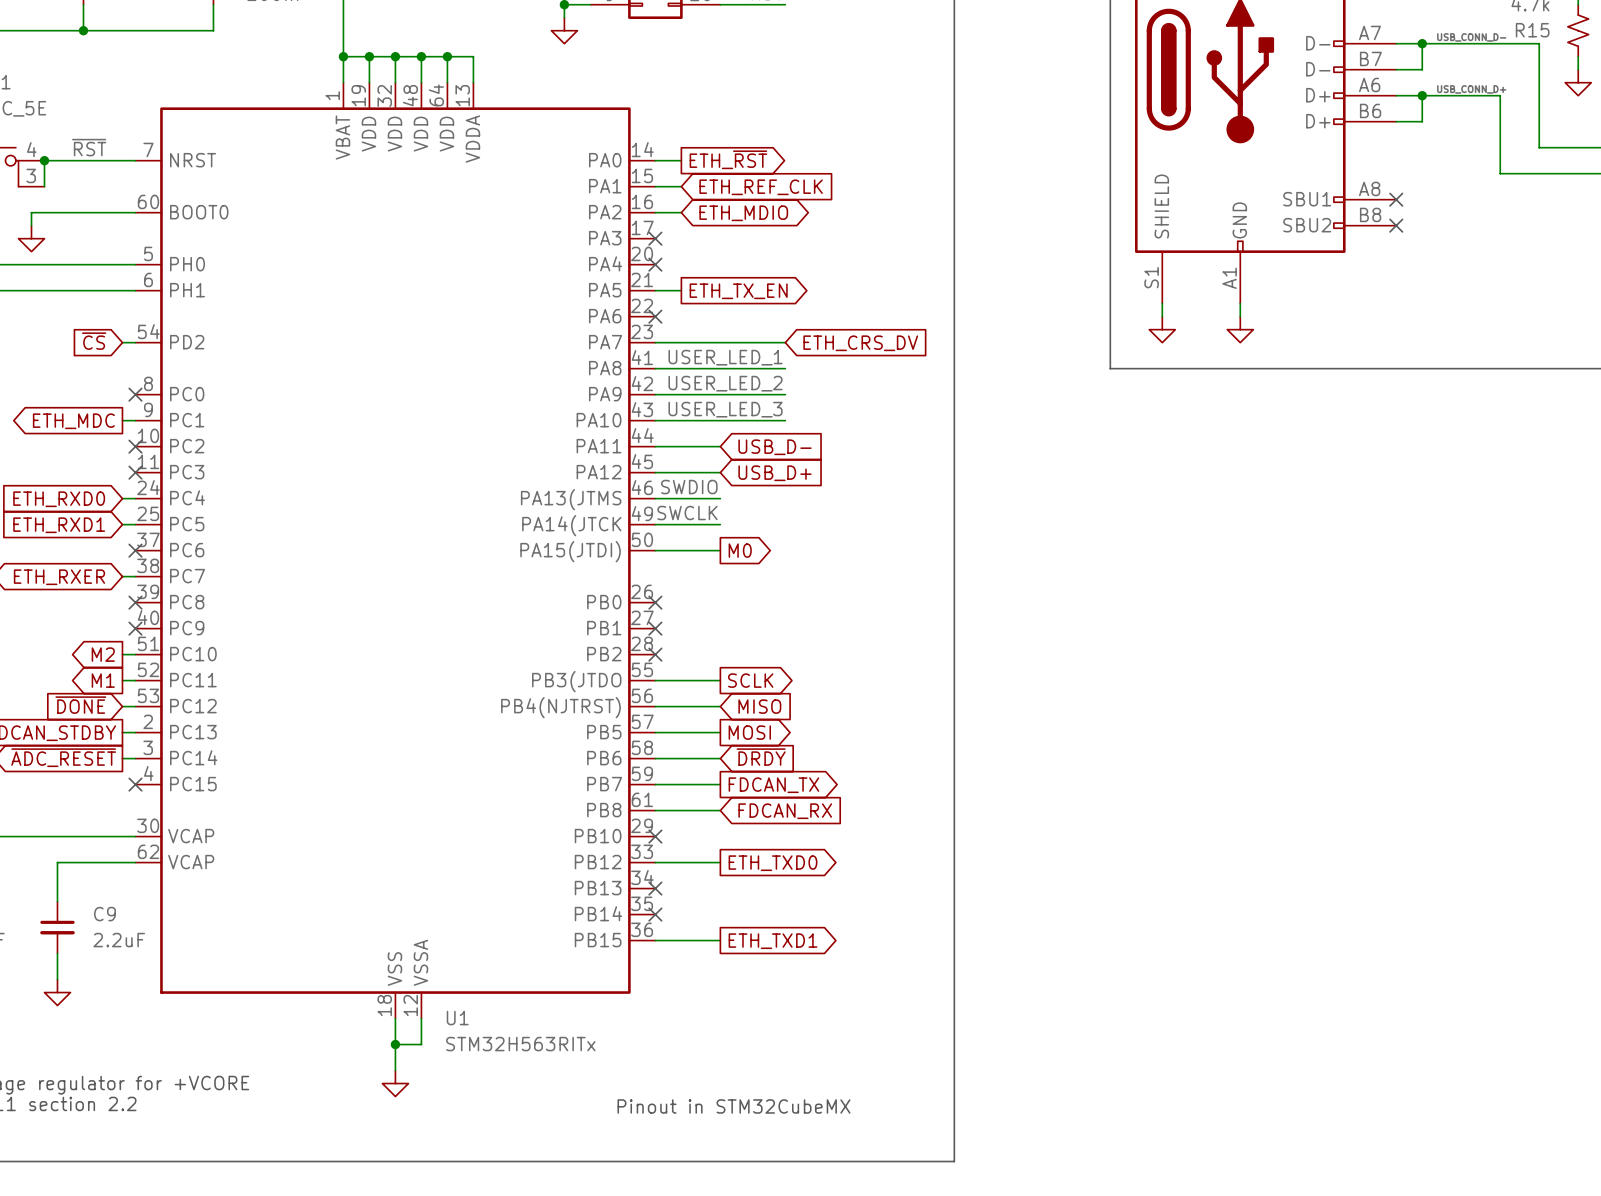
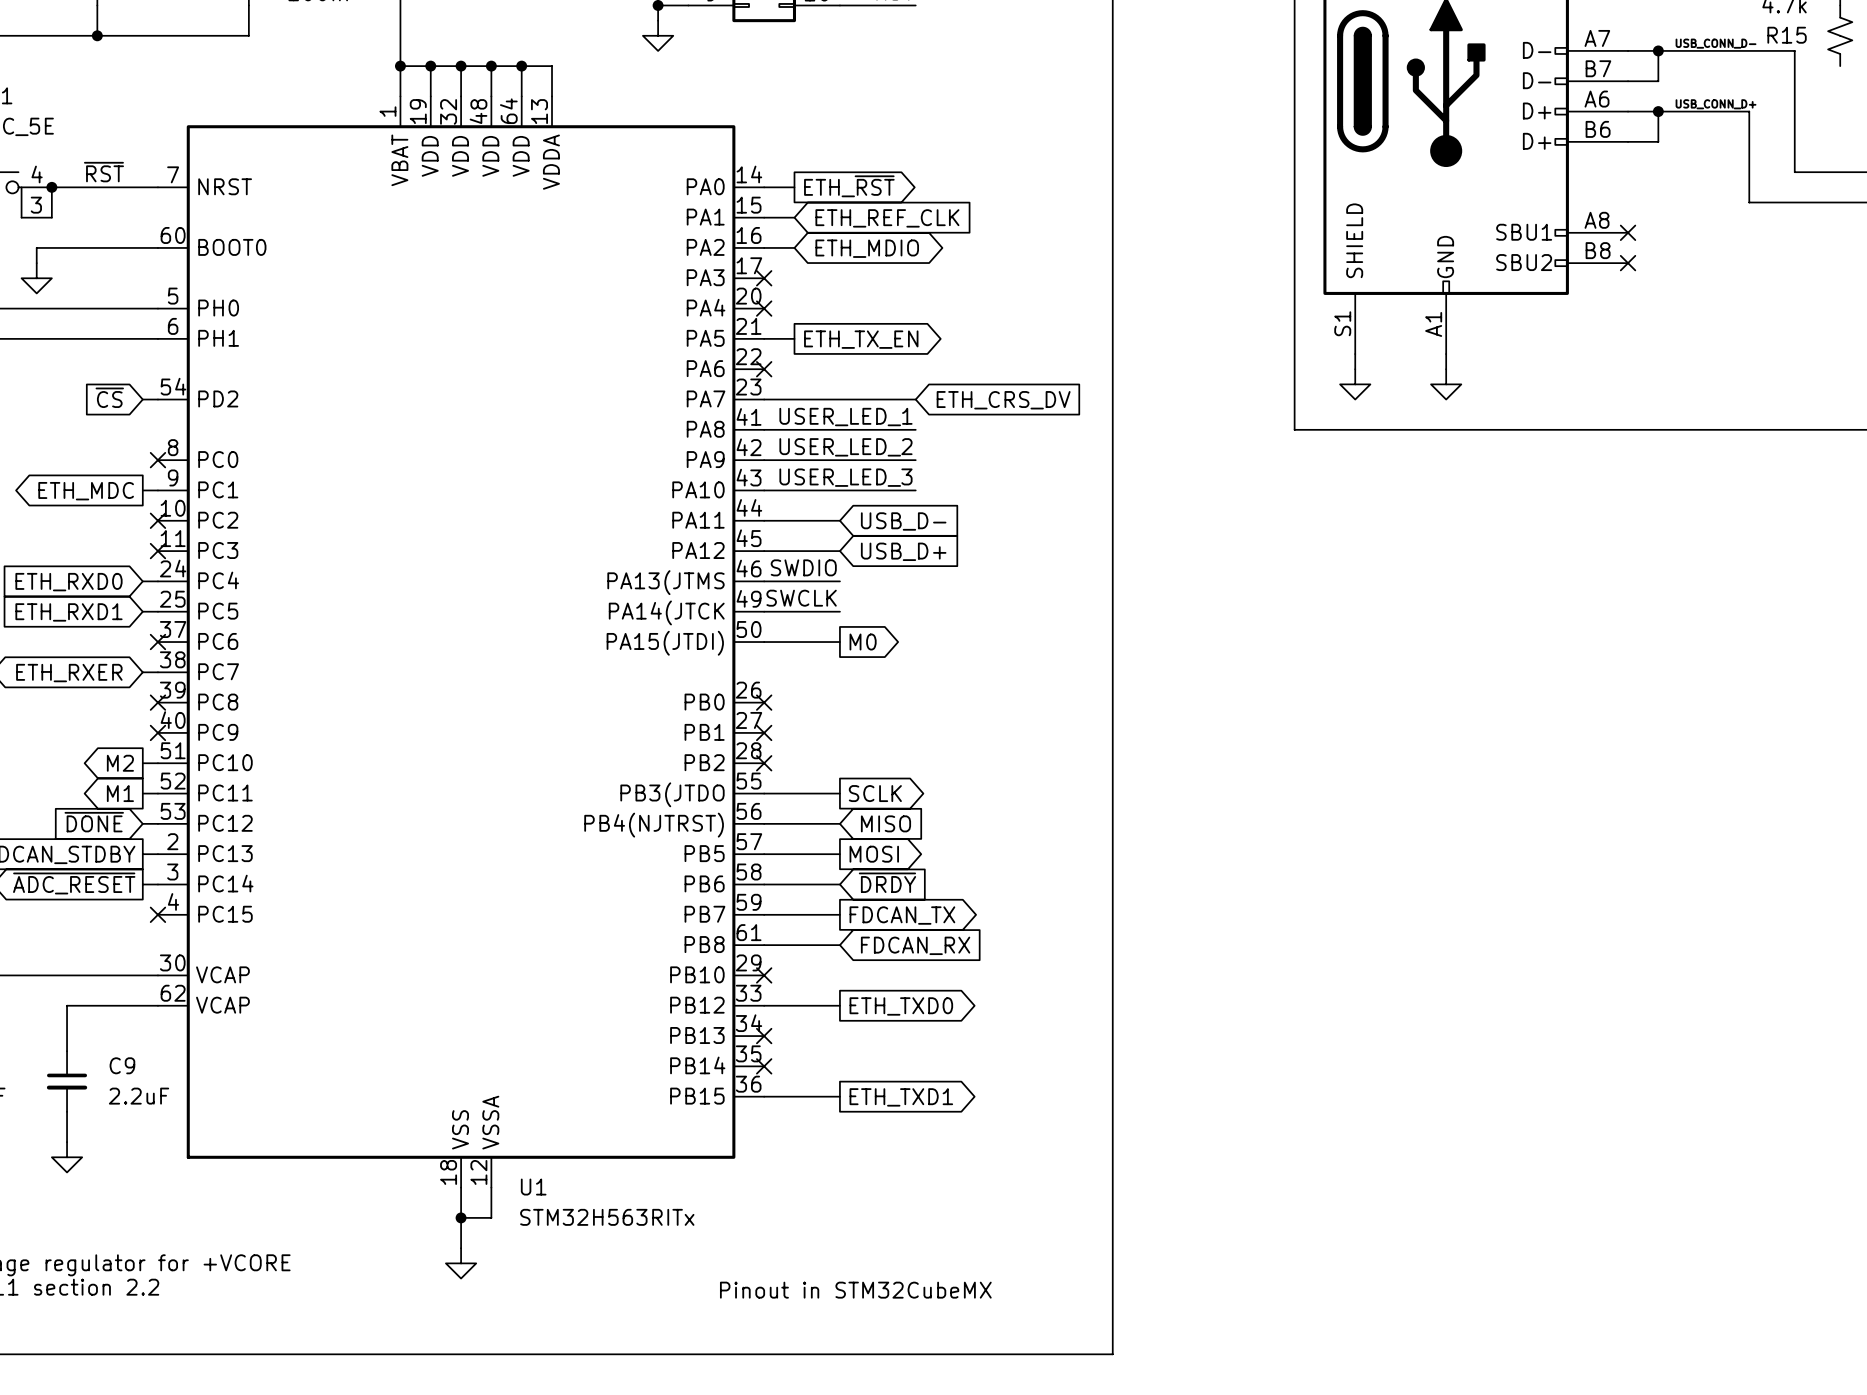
wire: (1578, 56) (1578, 69) -> none
power symbol: (1578, 82) -> none

